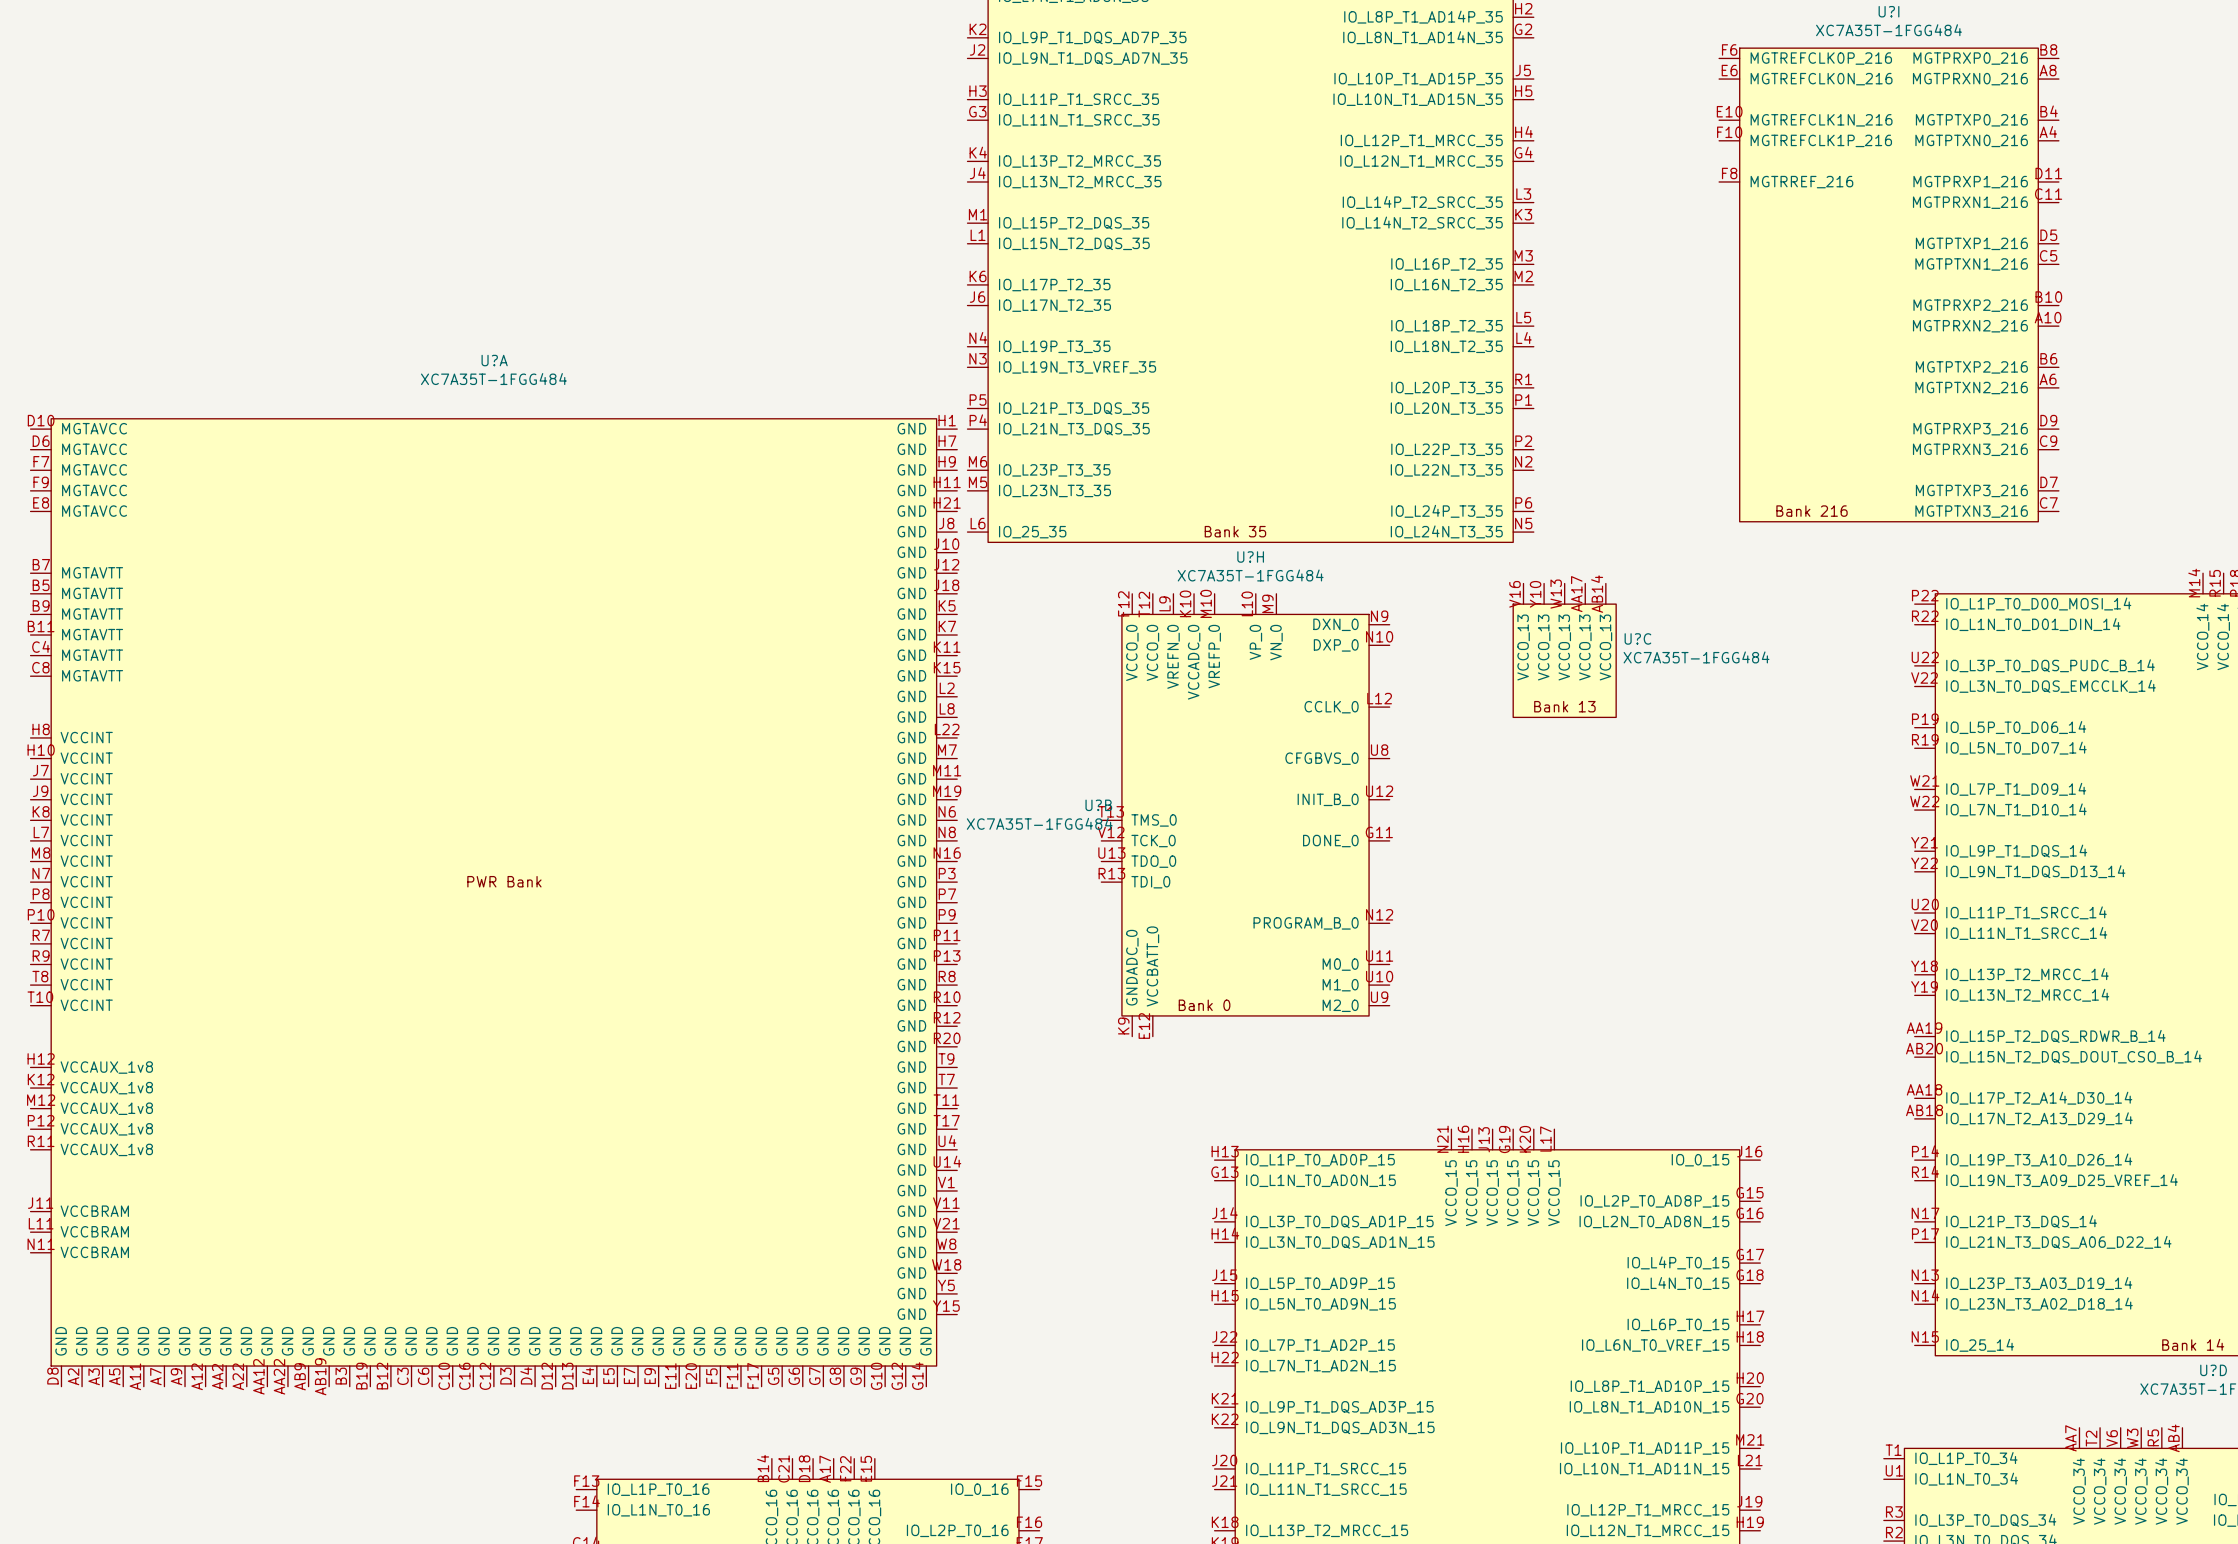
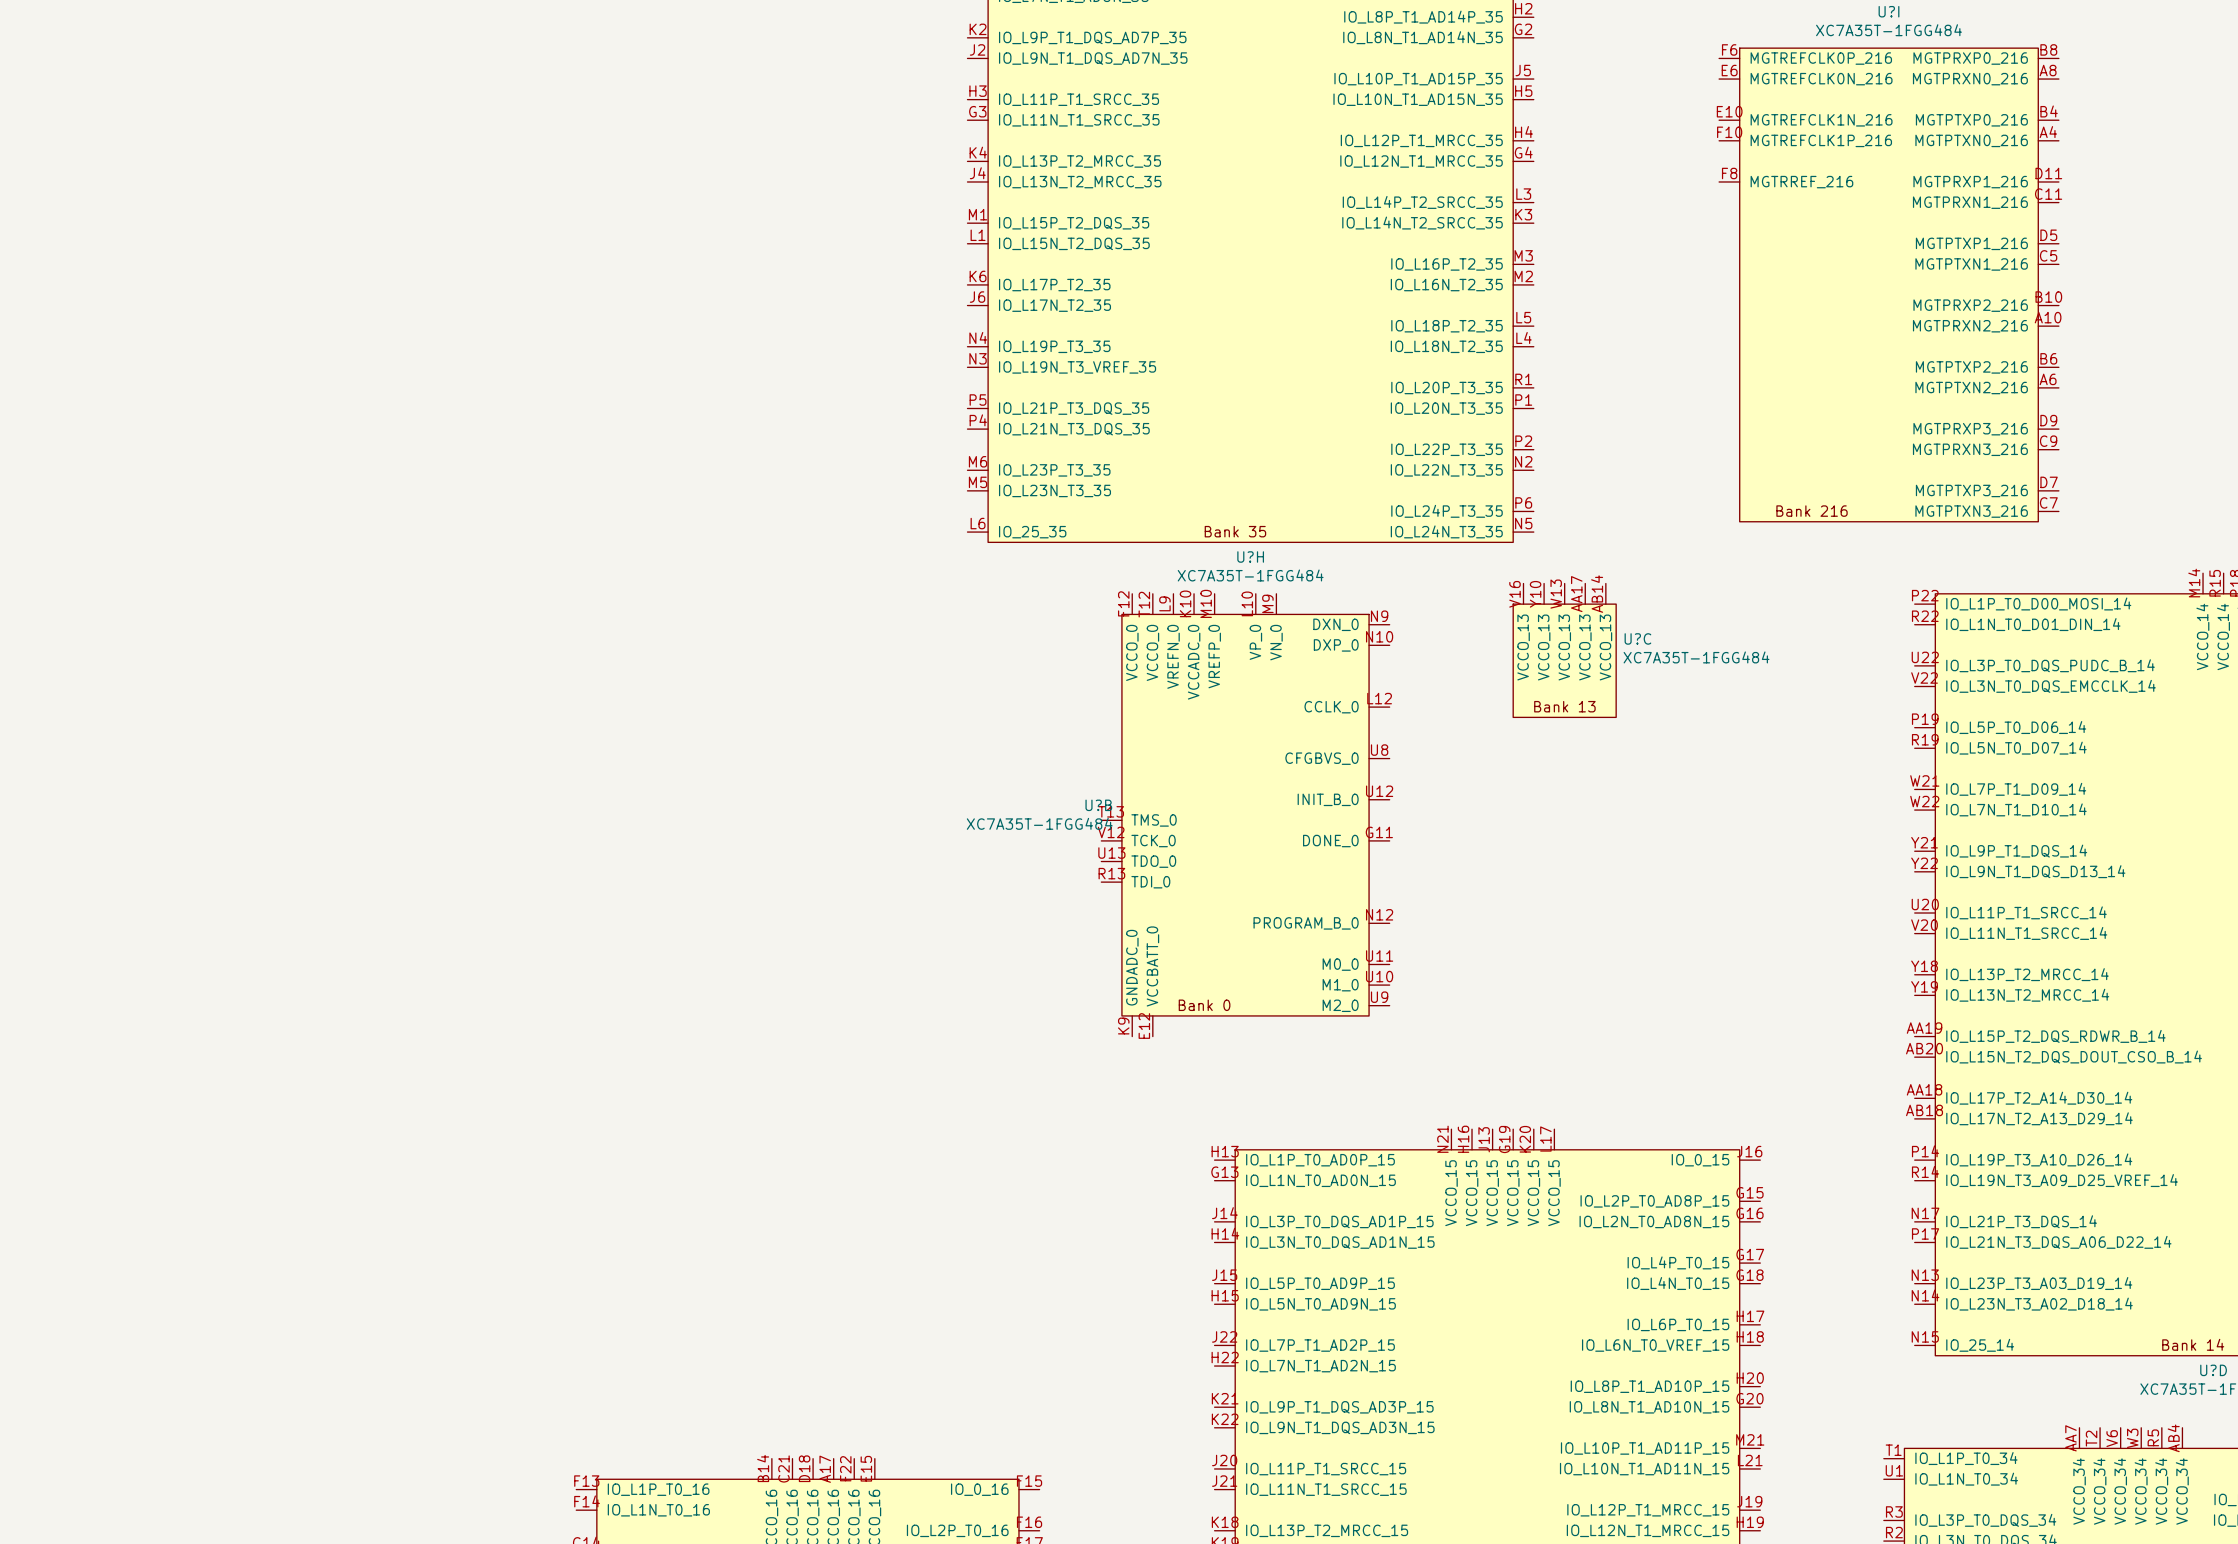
U?A: XC7A35T-1FGG484 (493, 902) -> none

